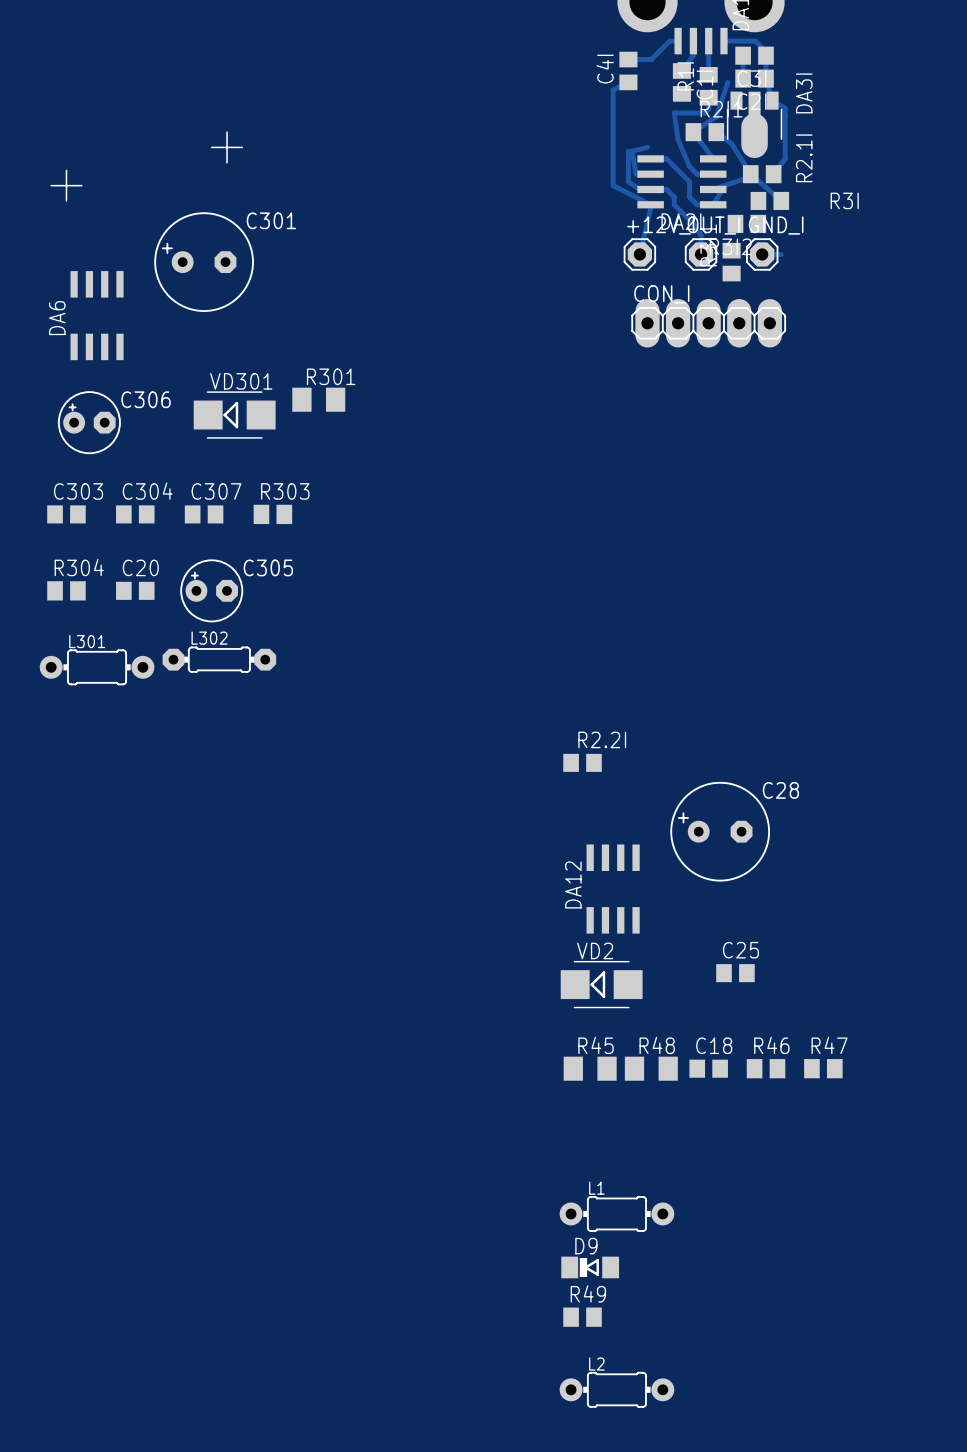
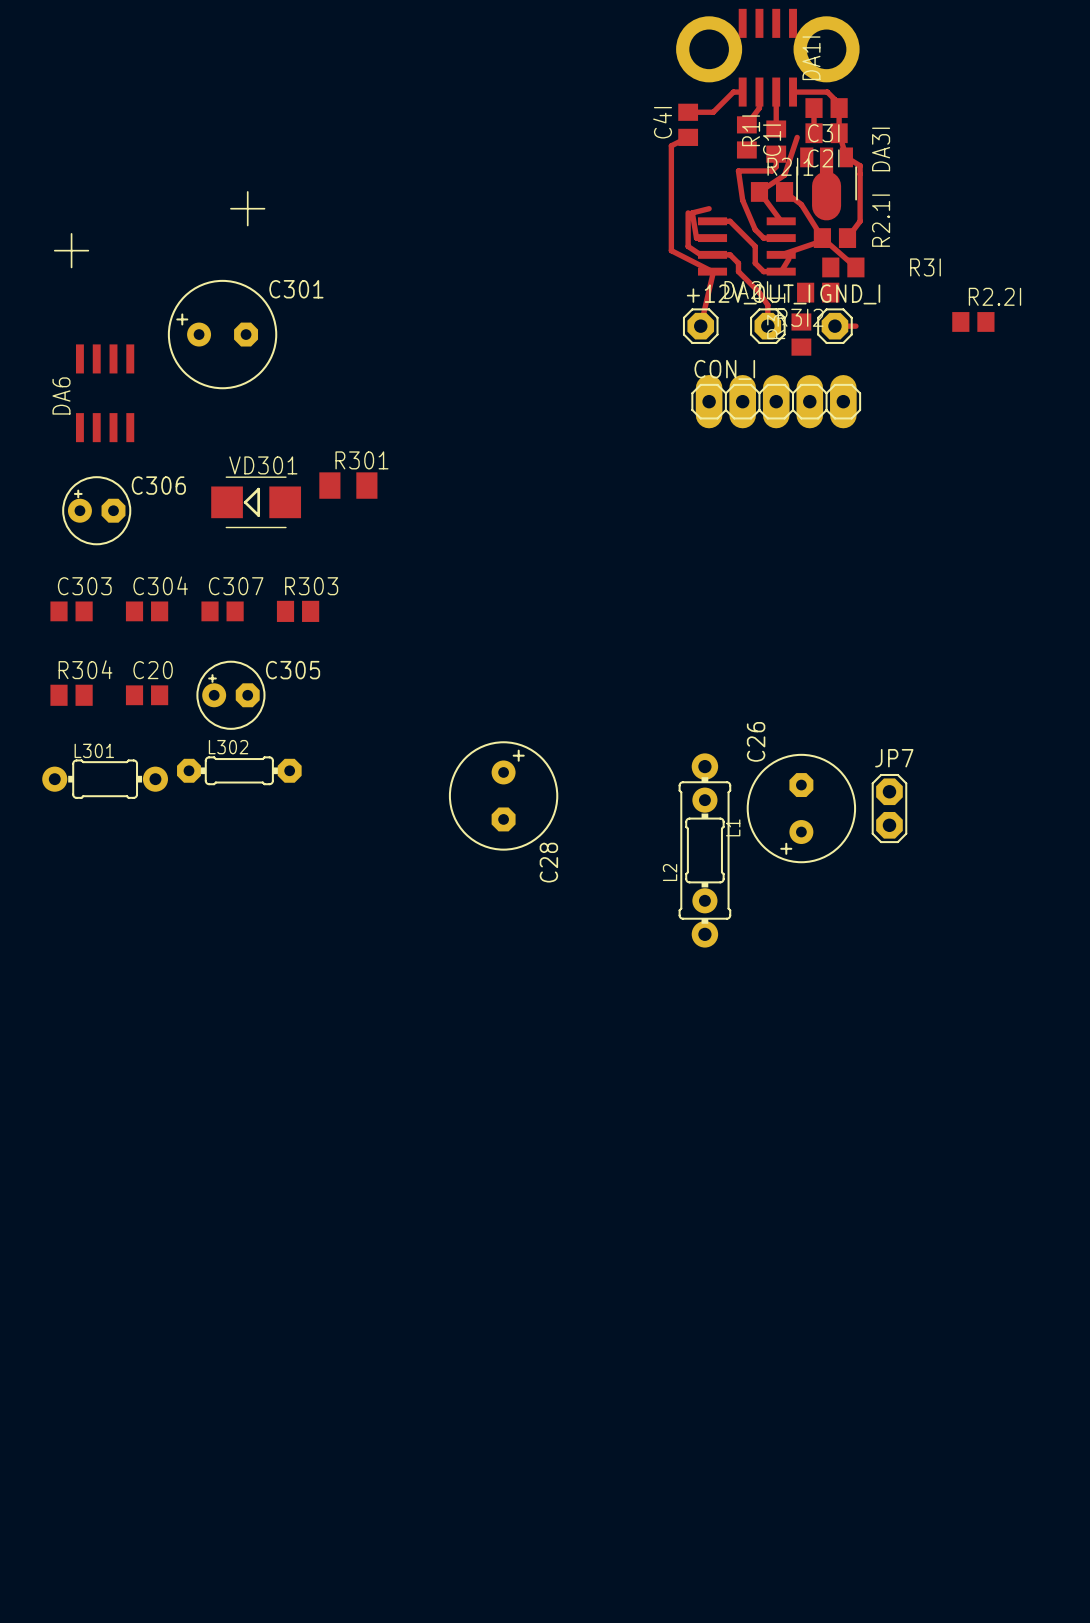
C26: none -> (801, 808)
JP7: none -> (889, 808)
R2.2I position: (582, 762) -> (973, 321)
C28 rotation: 0° (720, 831) -> 90° clockwise (503, 795)
C28 position: (720, 831) -> (503, 795)
DA12: (613, 889) -> none
C25: (735, 973) -> none
VD2: (601, 984) -> none
R45: (590, 1068) -> none
R48: (651, 1068) -> none
C18: (708, 1068) -> none
R46: (766, 1068) -> none
R47: (823, 1068) -> none
L1 rotation: 0° (616, 1213) -> 90° clockwise (704, 850)
L1 position: (616, 1213) -> (704, 850)
D9: (590, 1267) -> none
R49: (582, 1317) -> none
L2 name position: L2 (596, 1364) -> L2 (670, 872)
L2 footprint: [559, 1371, 675, 1408] -> [678, 753, 732, 948]

